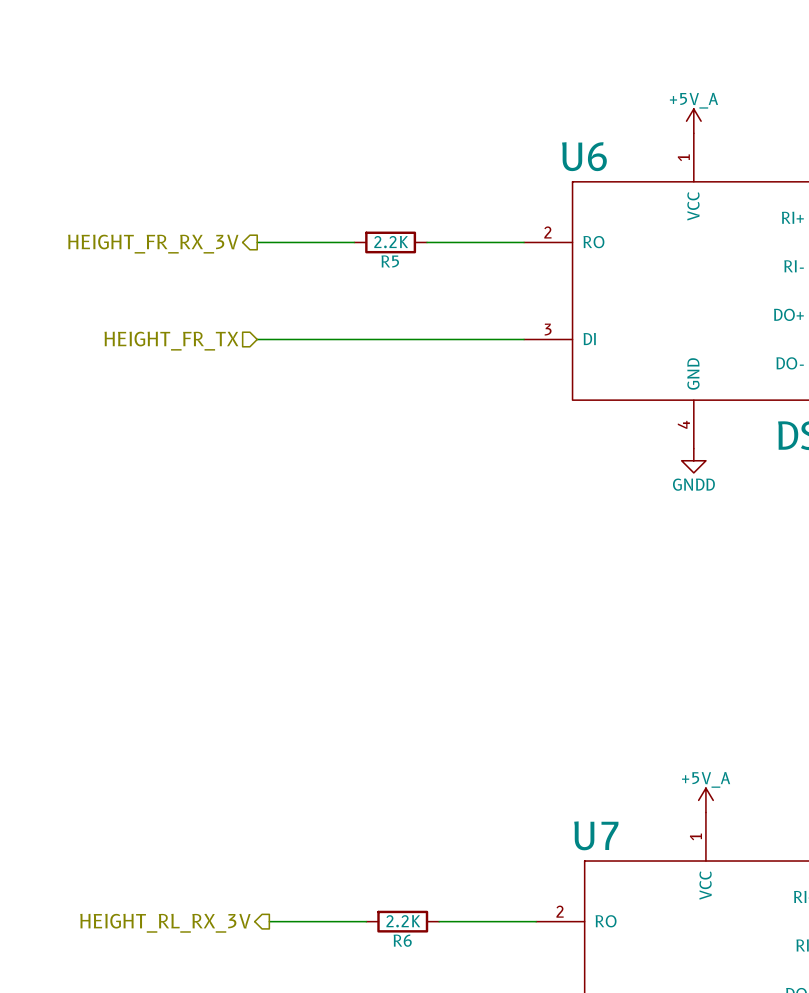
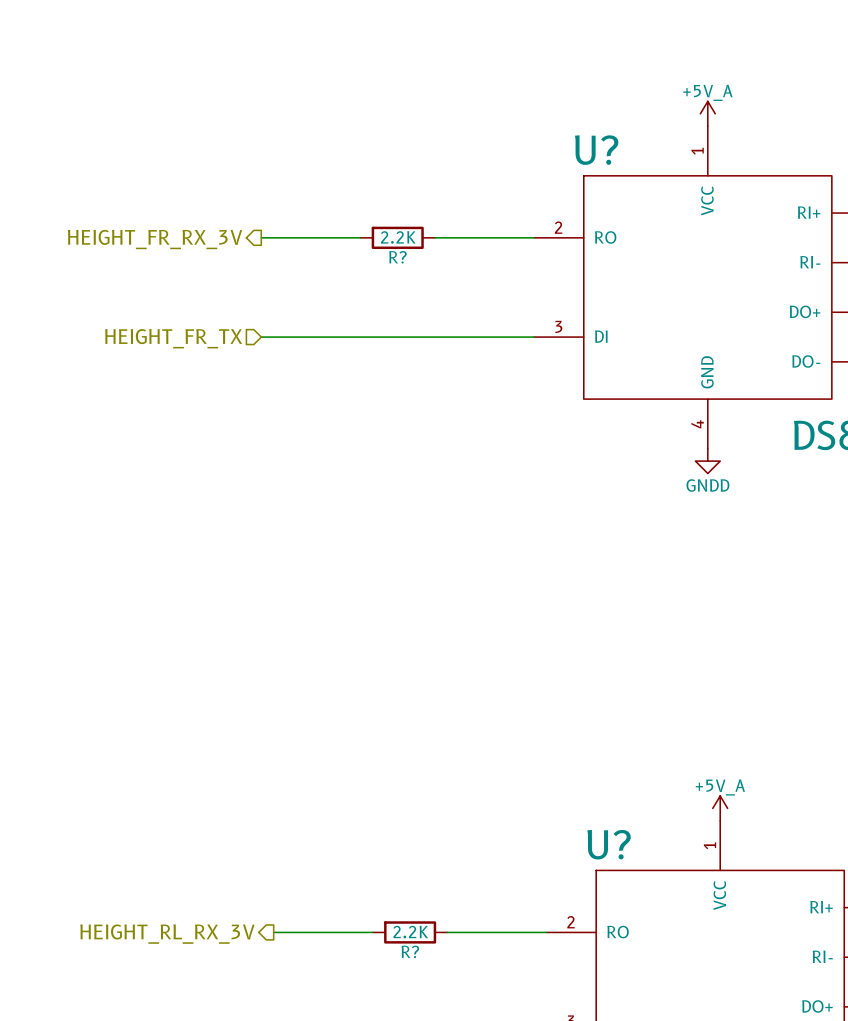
U6 name: U6 (584, 156) -> U? (596, 150)
R5 name: R5 (390, 261) -> R? (397, 257)
U7 name: U7 (596, 835) -> U? (609, 844)
R6 name: R6 (402, 940) -> R? (410, 951)

